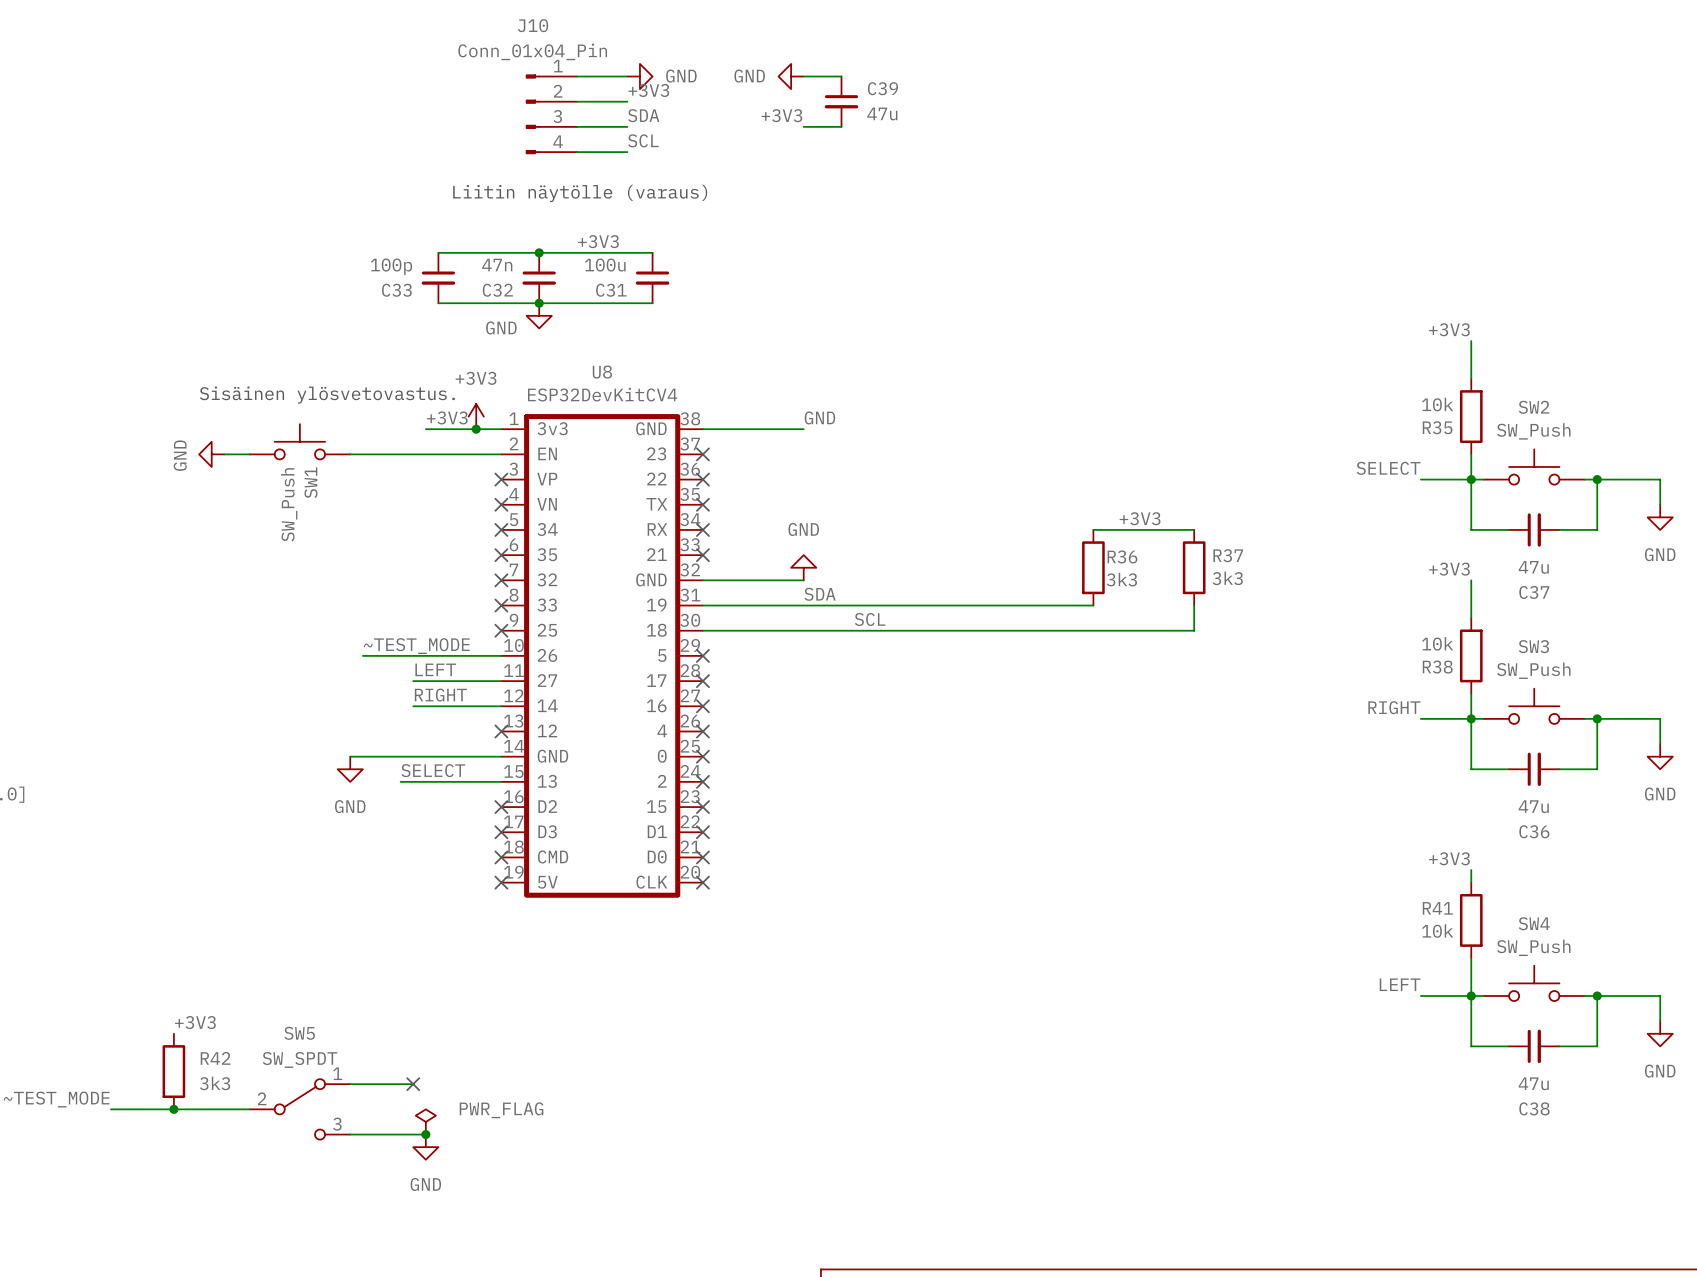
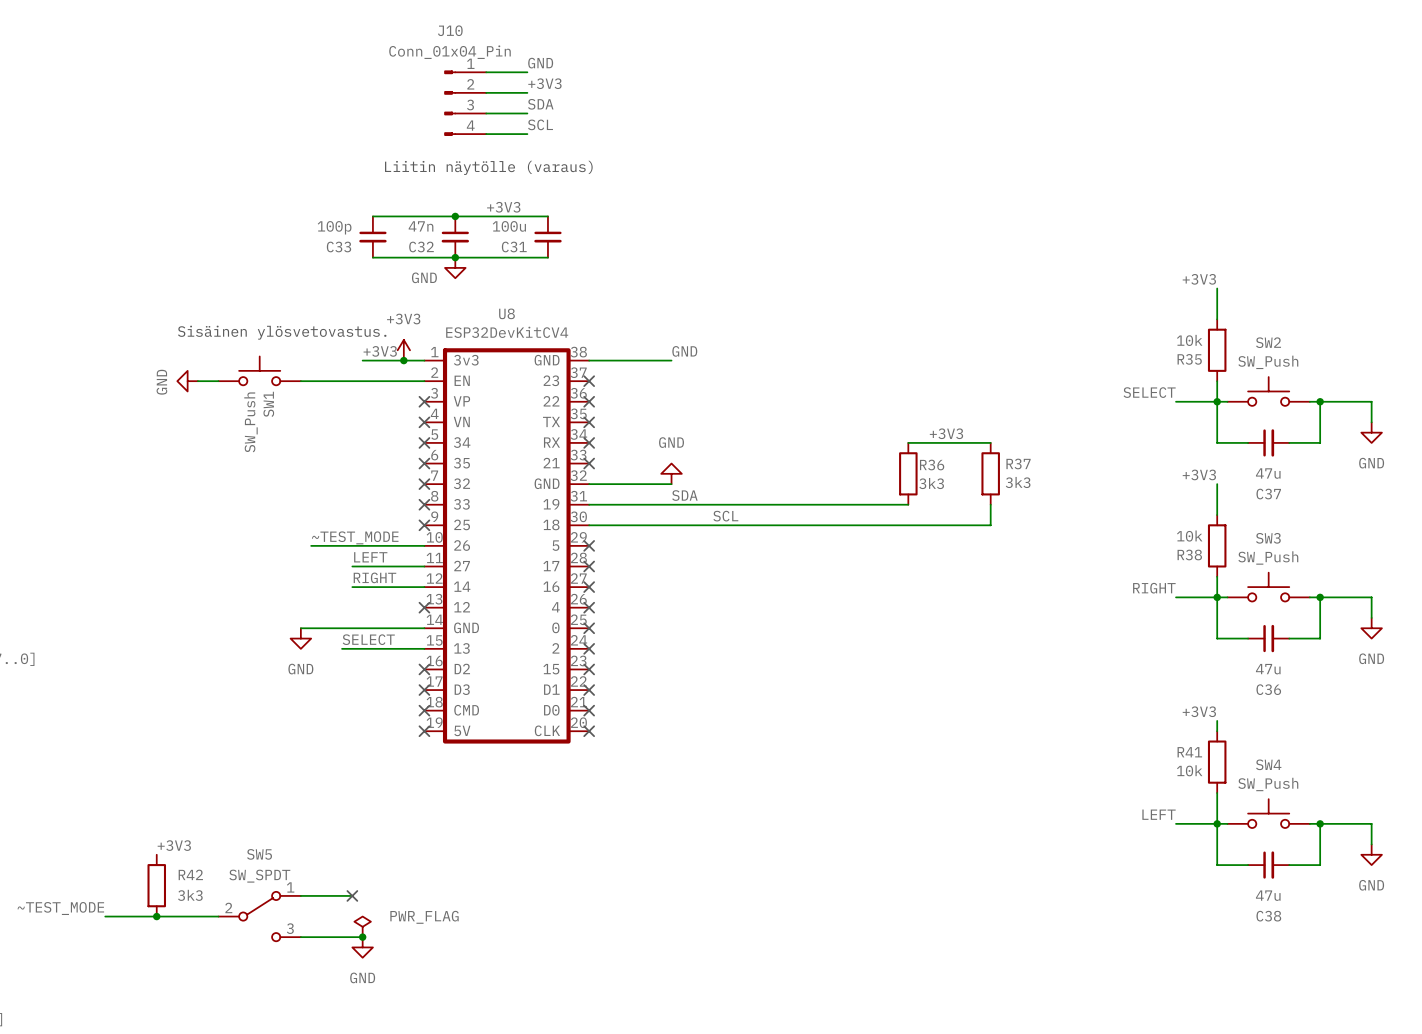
label: none -> GND (540, 63)
power symbol: GND (639, 76) -> none
power symbol: GND (791, 76) -> none
wire: (803, 76) (841, 76) -> none
C39: 47u (841, 101) -> none
label: +3V3 (781, 115) -> none
wire: (803, 126) (841, 126) -> none

